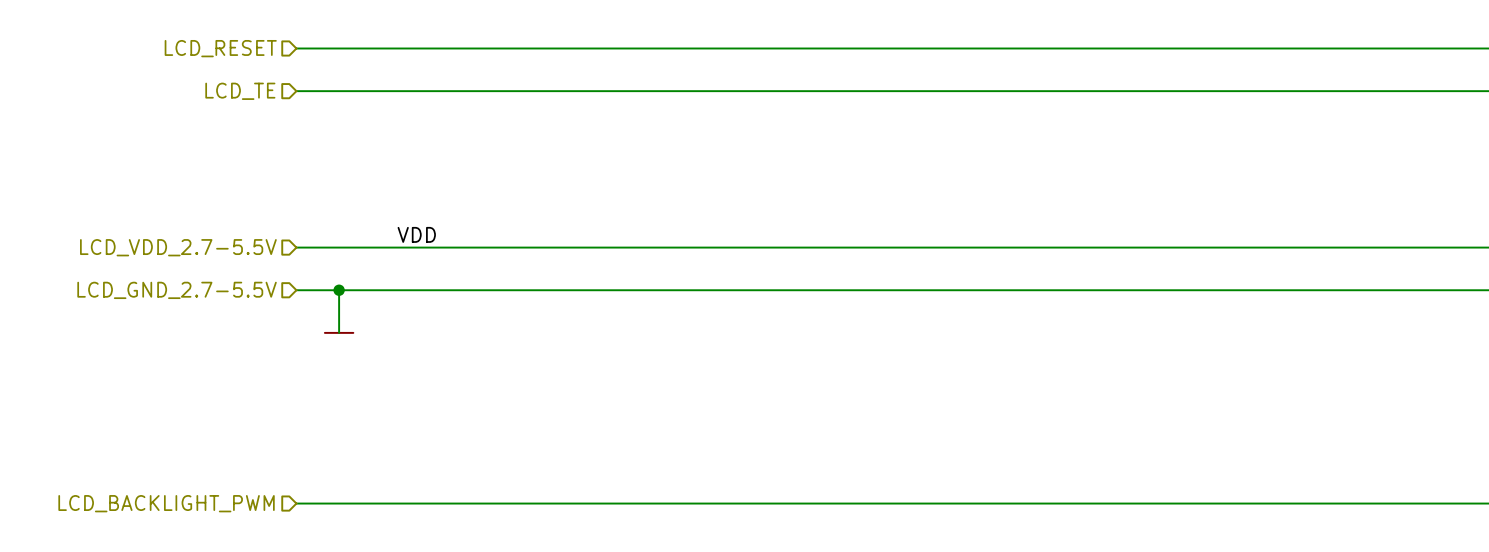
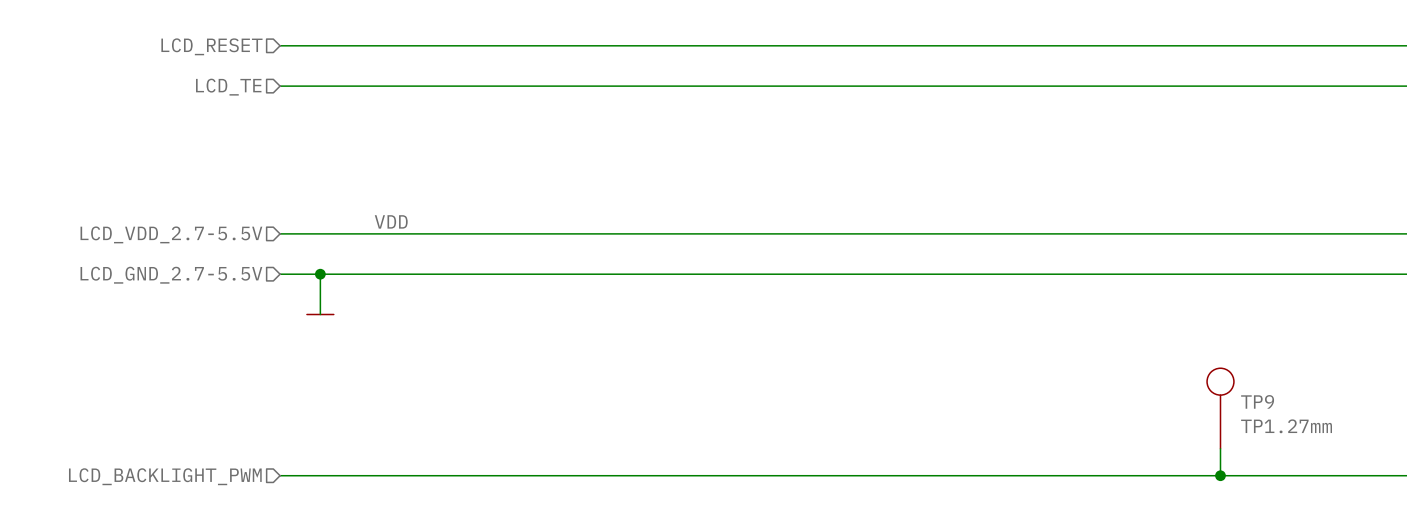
TP9: none -> TP1.27mm (1220, 408)
wire: none -> (1220, 448) (1220, 475)
junction: none -> (1220, 475)

